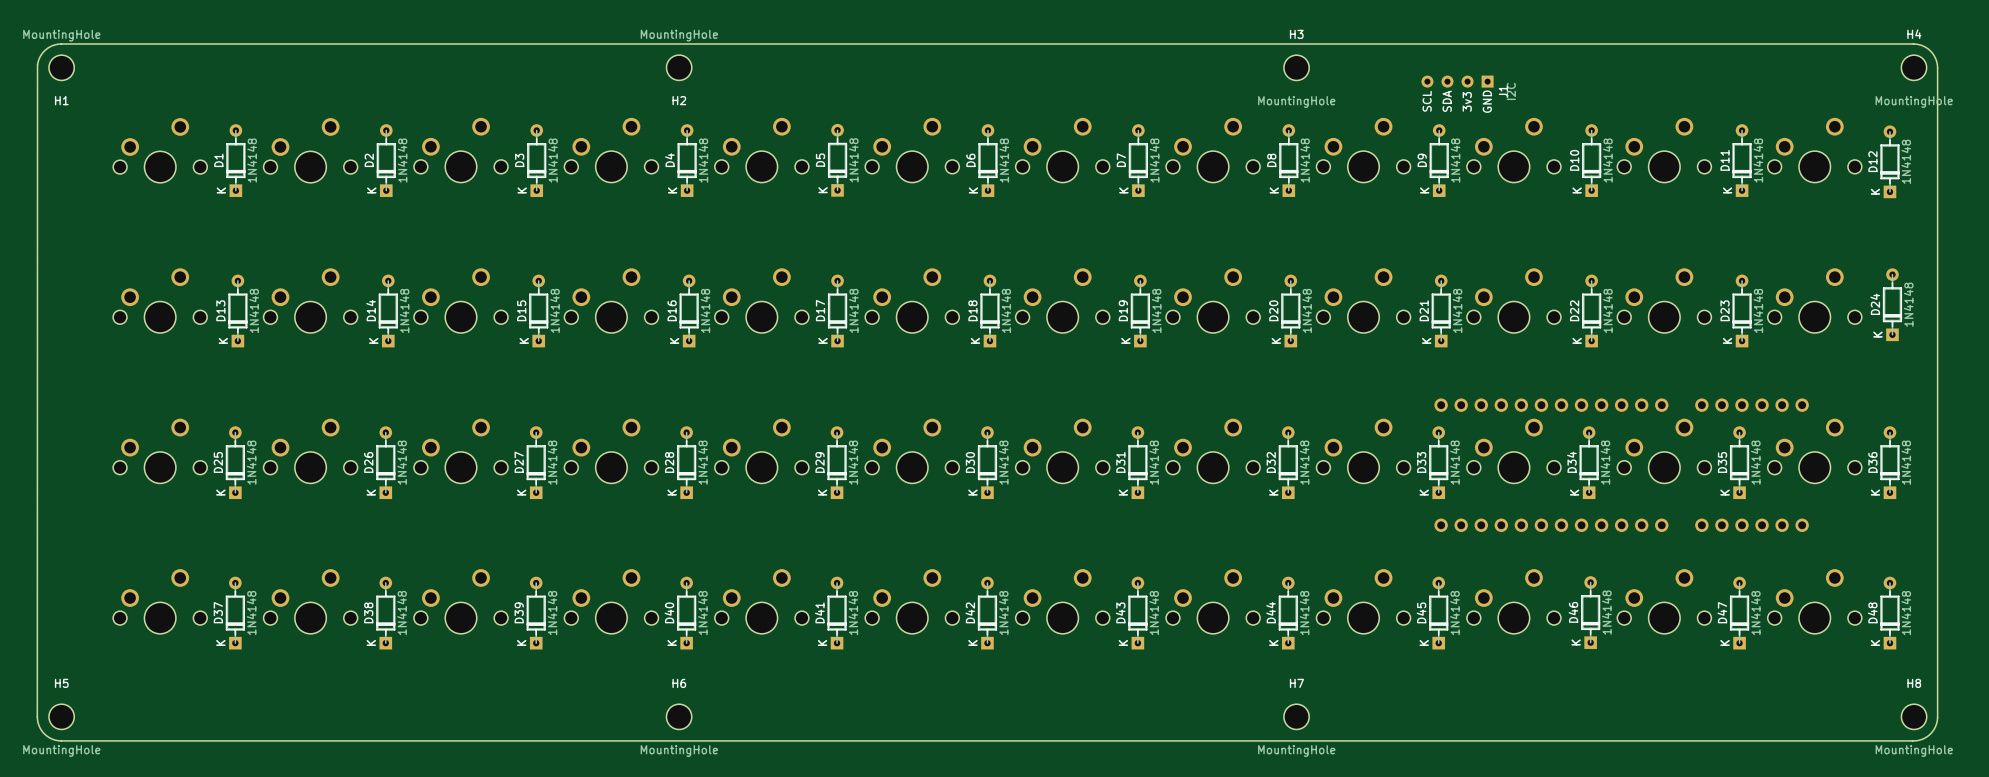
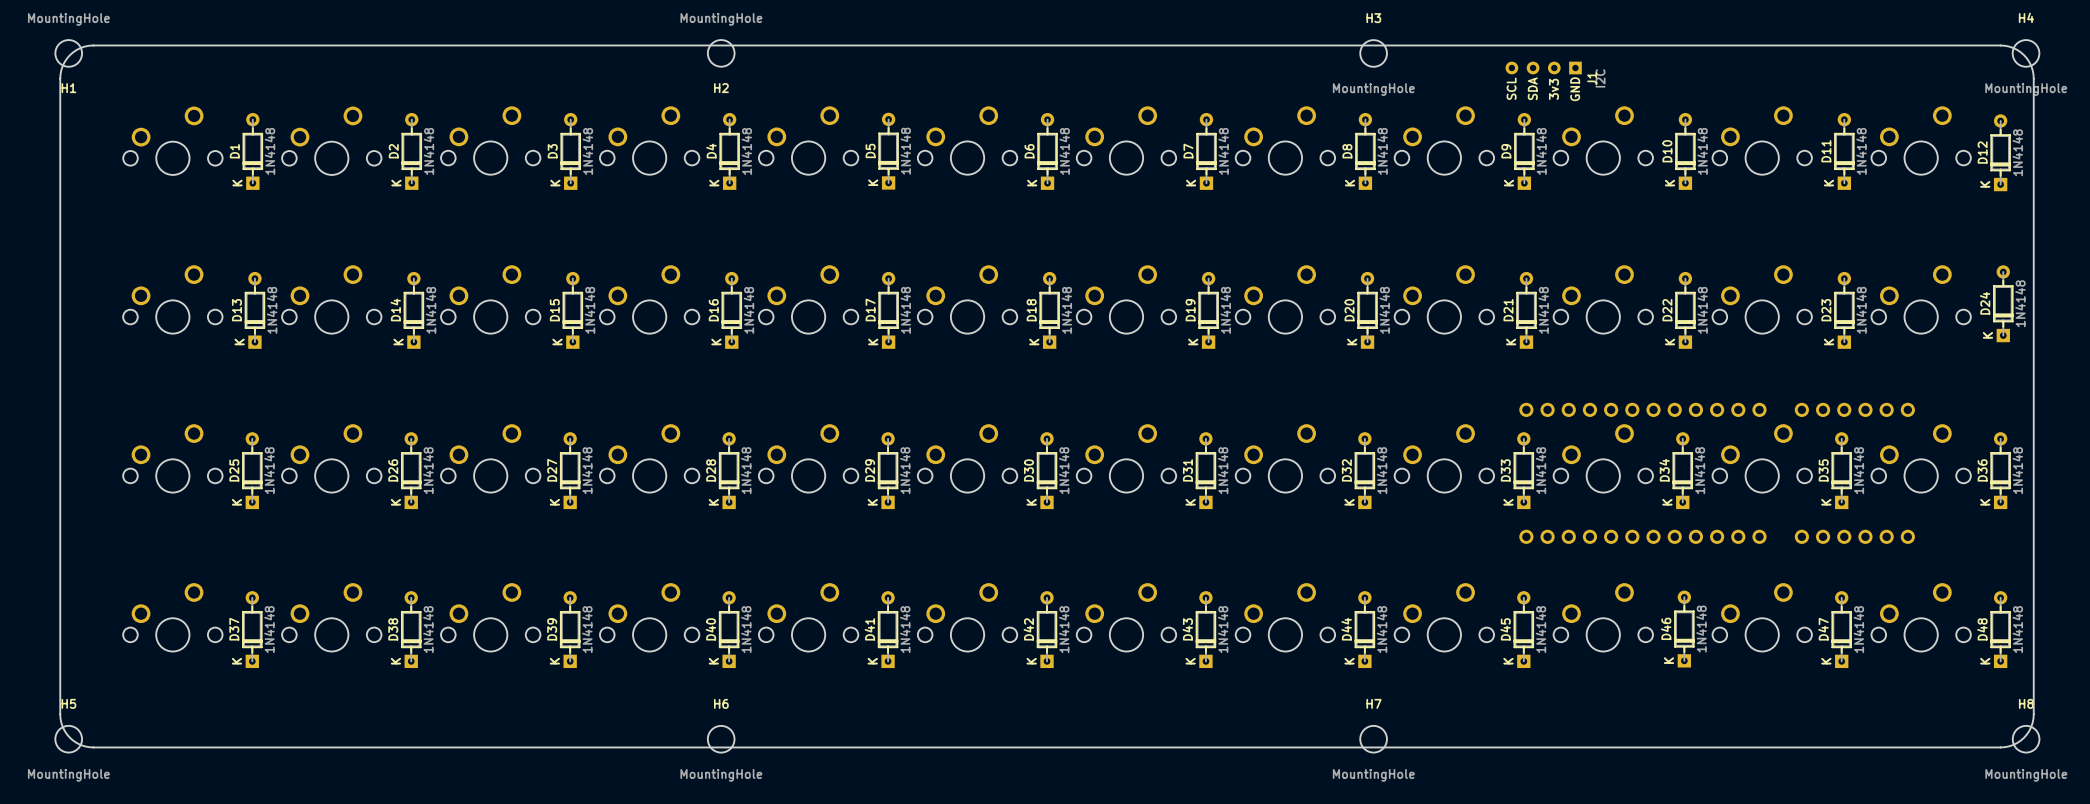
board edge: (61, 740) (1921, 739) (1932, 732) (1937, 717) (1937, 68) (1935, 58) (1928, 48) (1913, 43) (61, 43) (52, 45) (43, 52) (37, 64) (37, 716) (39, 726) (44, 733) (52, 739) (61, 740) -> (93, 45) (80, 48) (69, 55) (62, 65) (60, 78) (60, 714) (64, 730) (73, 740) (80, 744) (93, 747) (2000, 747) (2013, 744) (2020, 740) (2031, 727) (2033, 714) (2033, 78) (2032, 70) (2026, 58) (2013, 48) (2000, 45) (93, 45)

